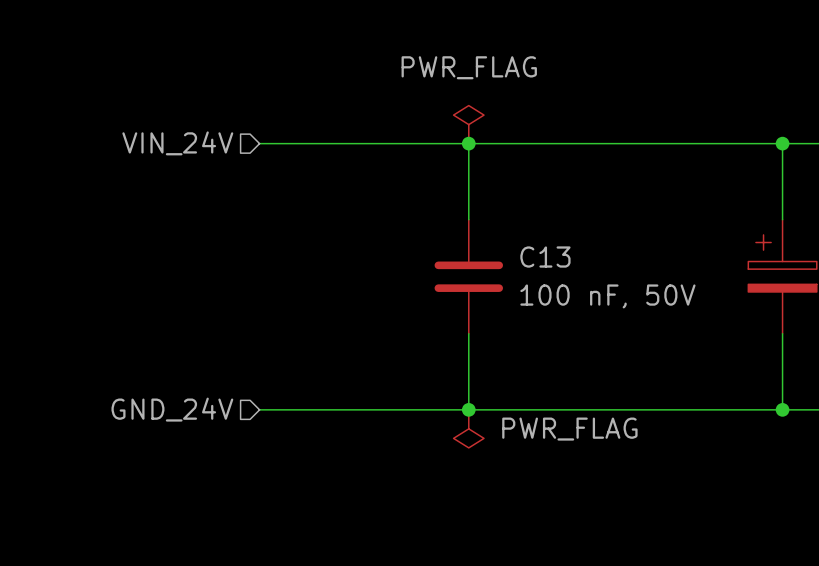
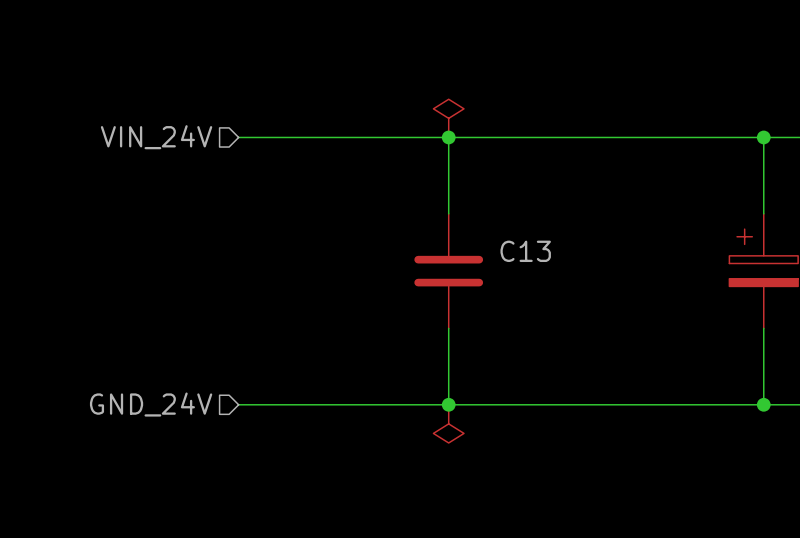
power symbol text: PWR_FLAG (469, 67) -> none
C13 value: 100 nF, 50V (607, 296) -> none
power symbol text: PWR_FLAG (569, 429) -> none

